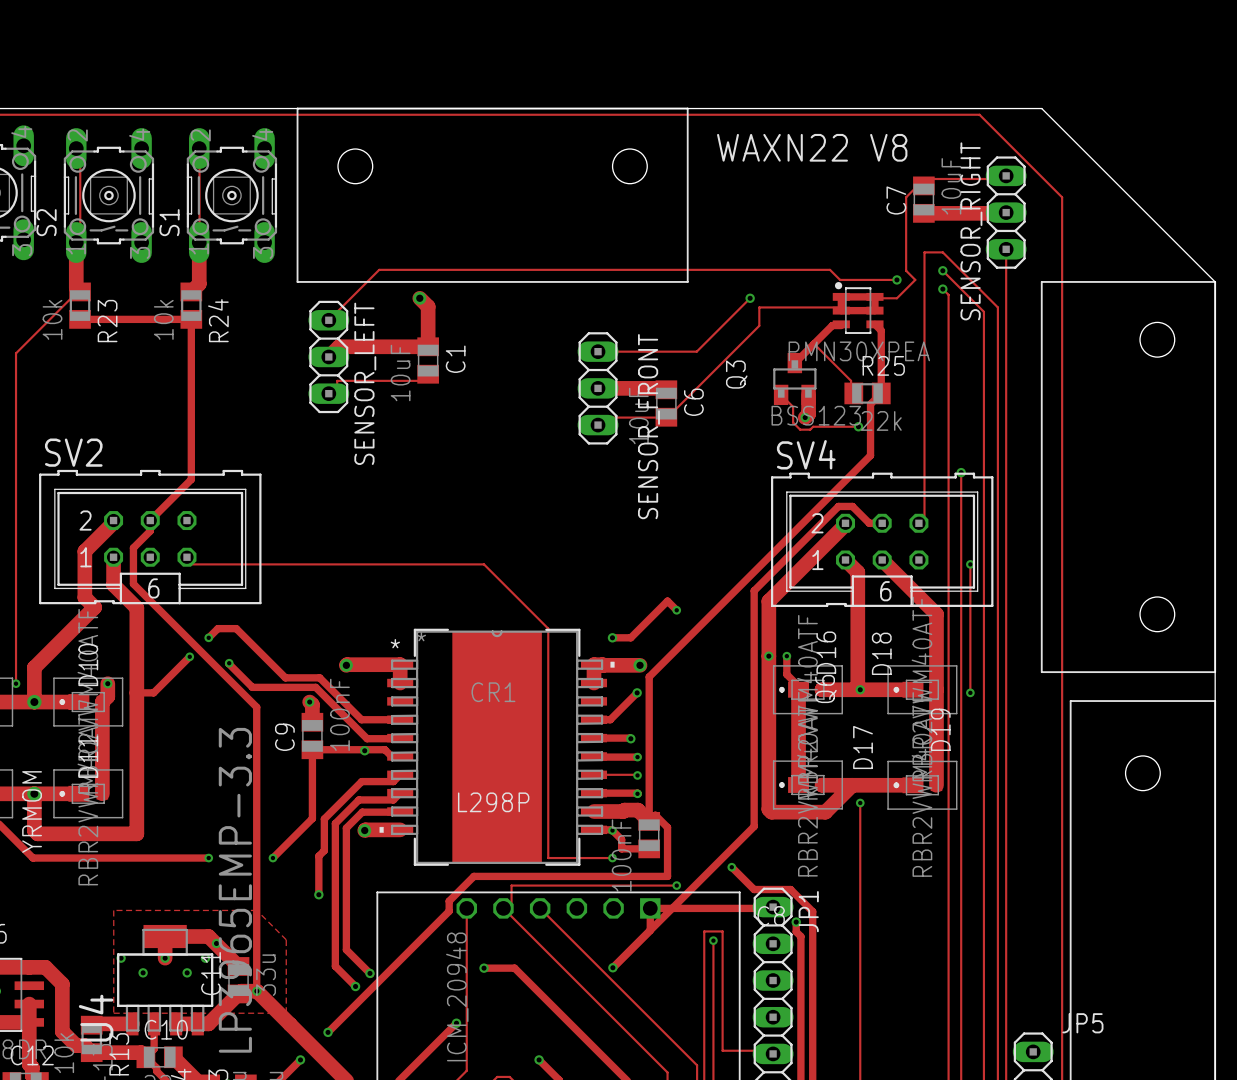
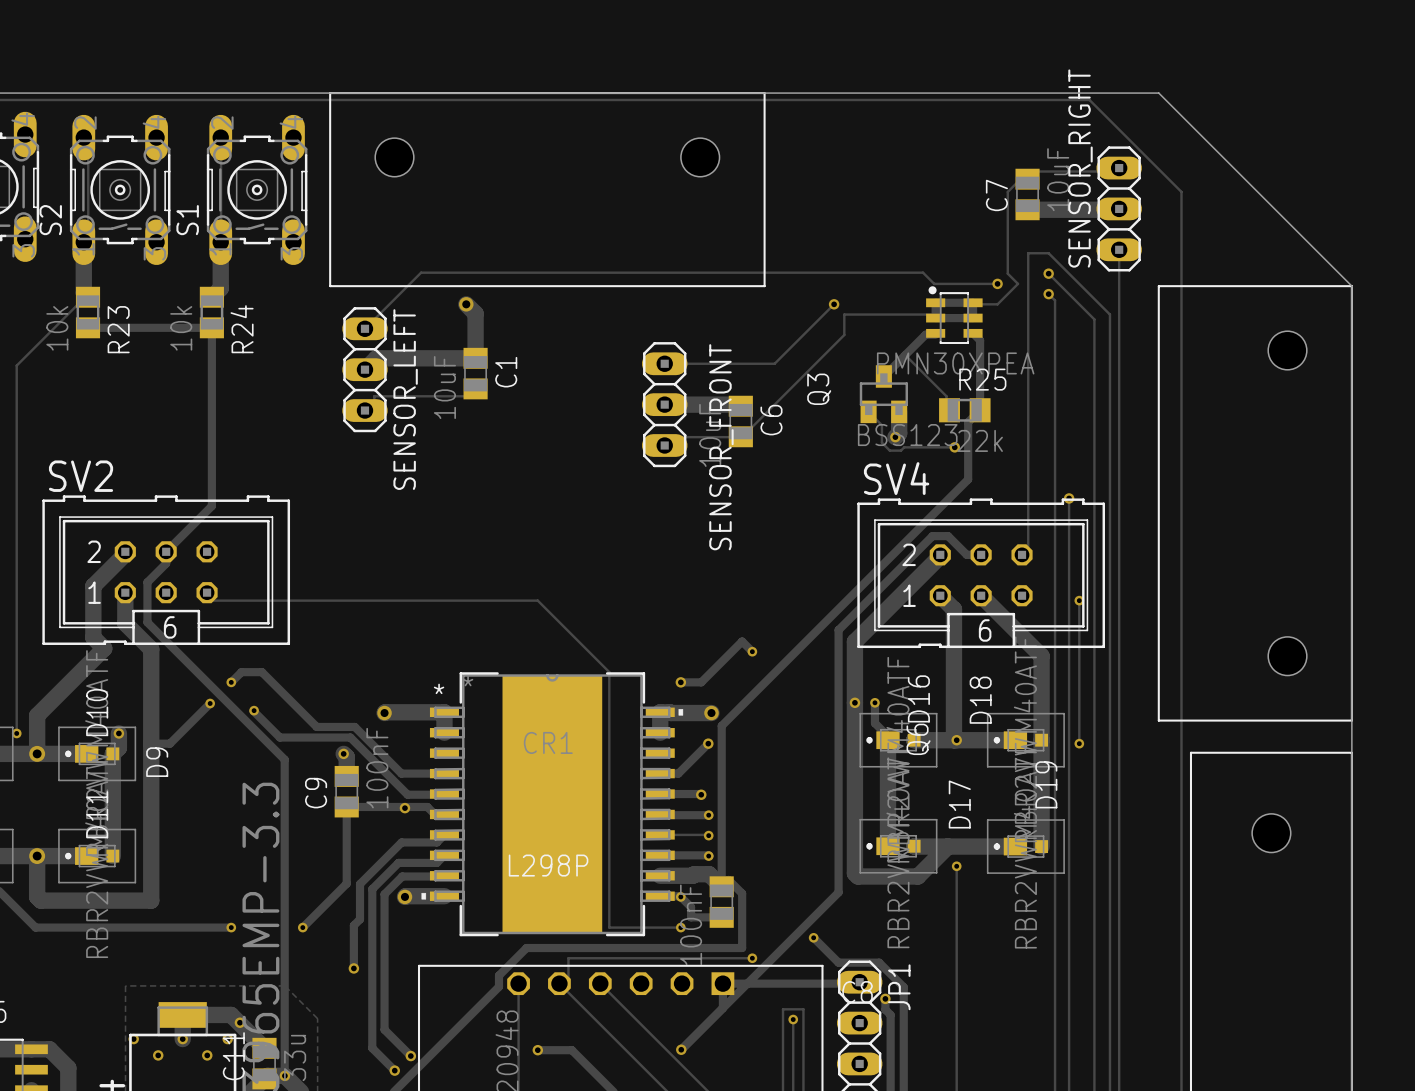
text: WAXN22 V8 (812, 147) -> none
SENSOR_RIGHT name position: SENSOR_RIGHT (971, 231) -> SENSOR_RIGHT (1080, 168)
YRMOM name: YRMOM (32, 811) -> D9 (157, 762)

